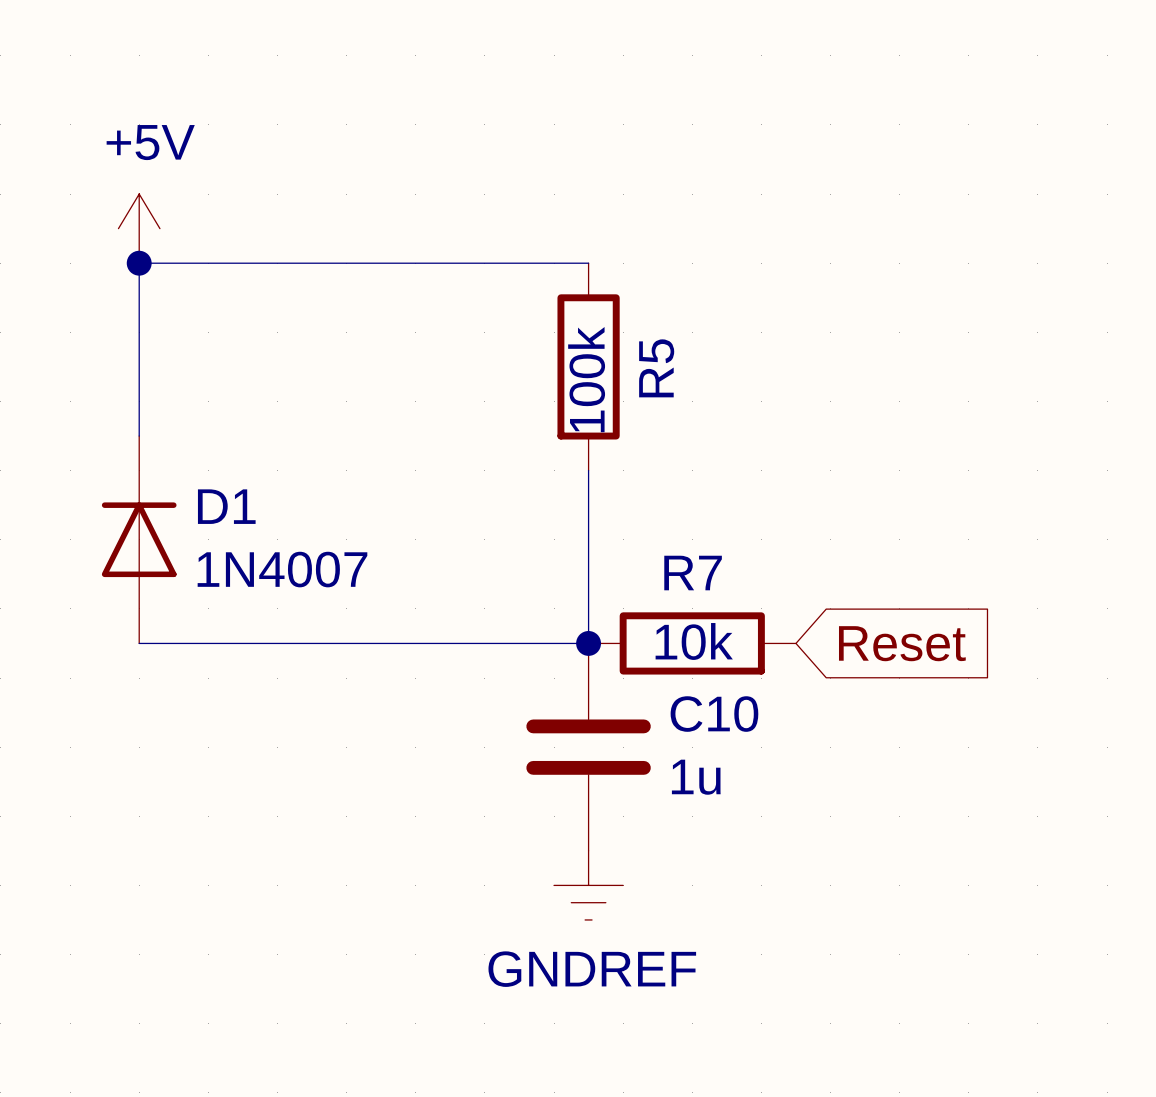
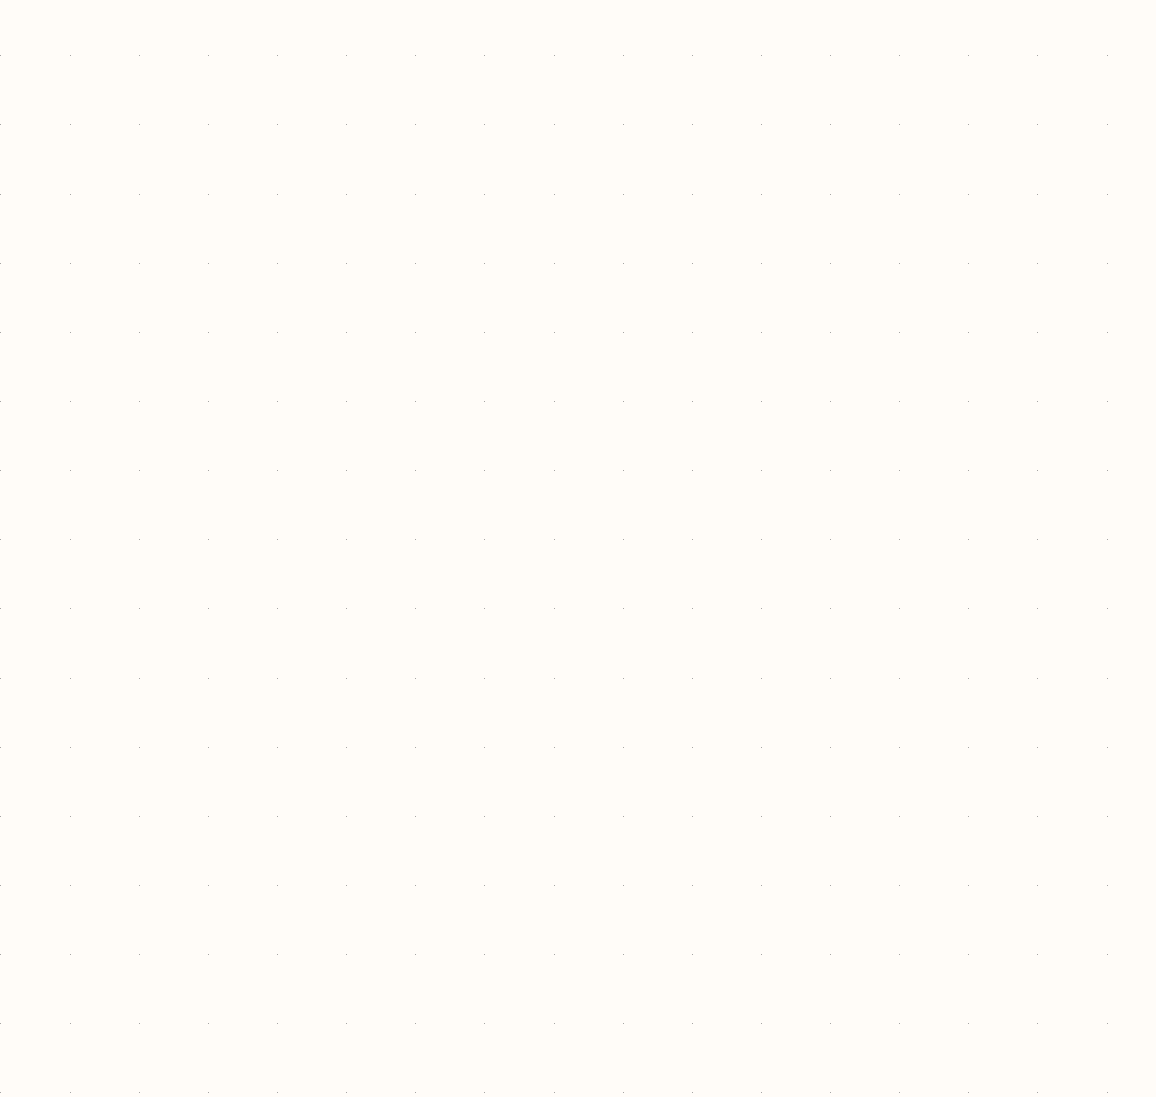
power symbol: +5V (139, 228) -> none
junction: (139, 263) -> none
wire: (588, 263) (139, 263) (139, 436) -> none
R5: 100k (588, 366) -> none
wire: (588, 470) (588, 643) (139, 643) -> none
D1: 1N4007 (139, 539) -> none
junction: (588, 643) -> none
R7: 10k (692, 643) -> none
global label: Reset (902, 643) -> none
C10: 1u (588, 747) -> none
power symbol: GNDREF (588, 885) -> none

